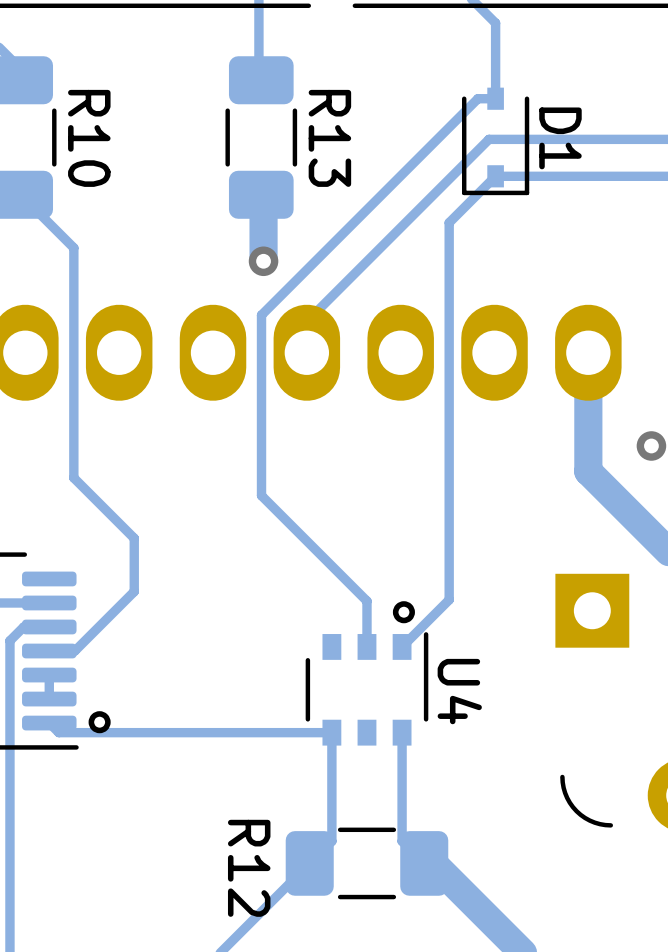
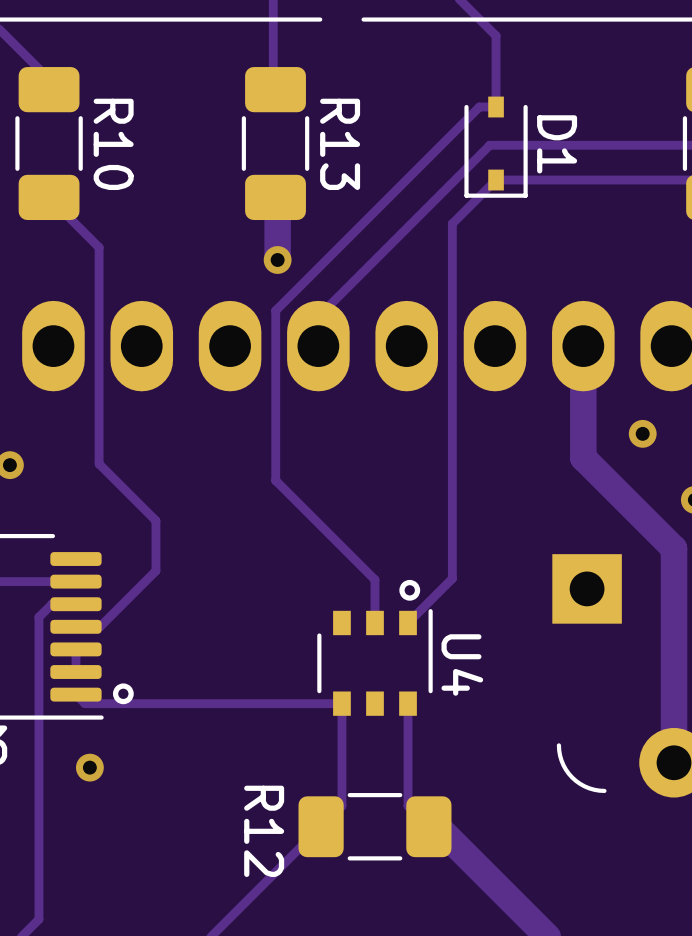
via: none -> (89, 767)

